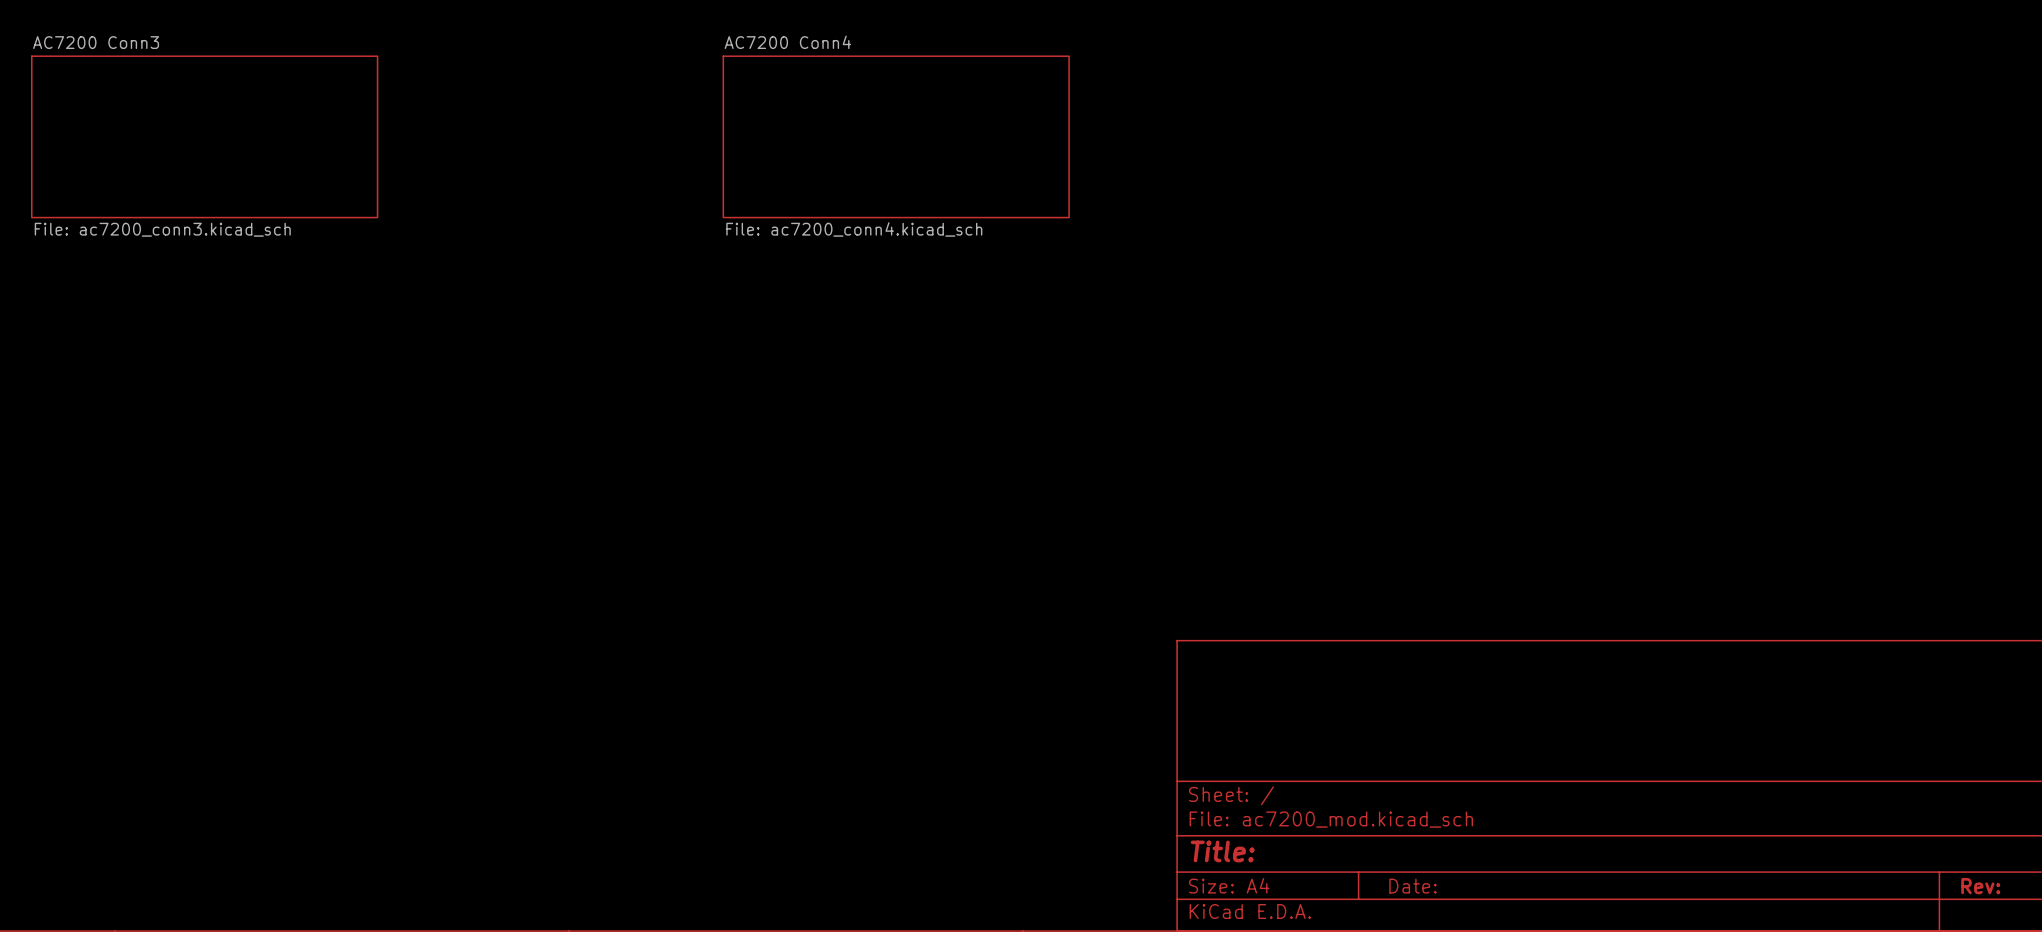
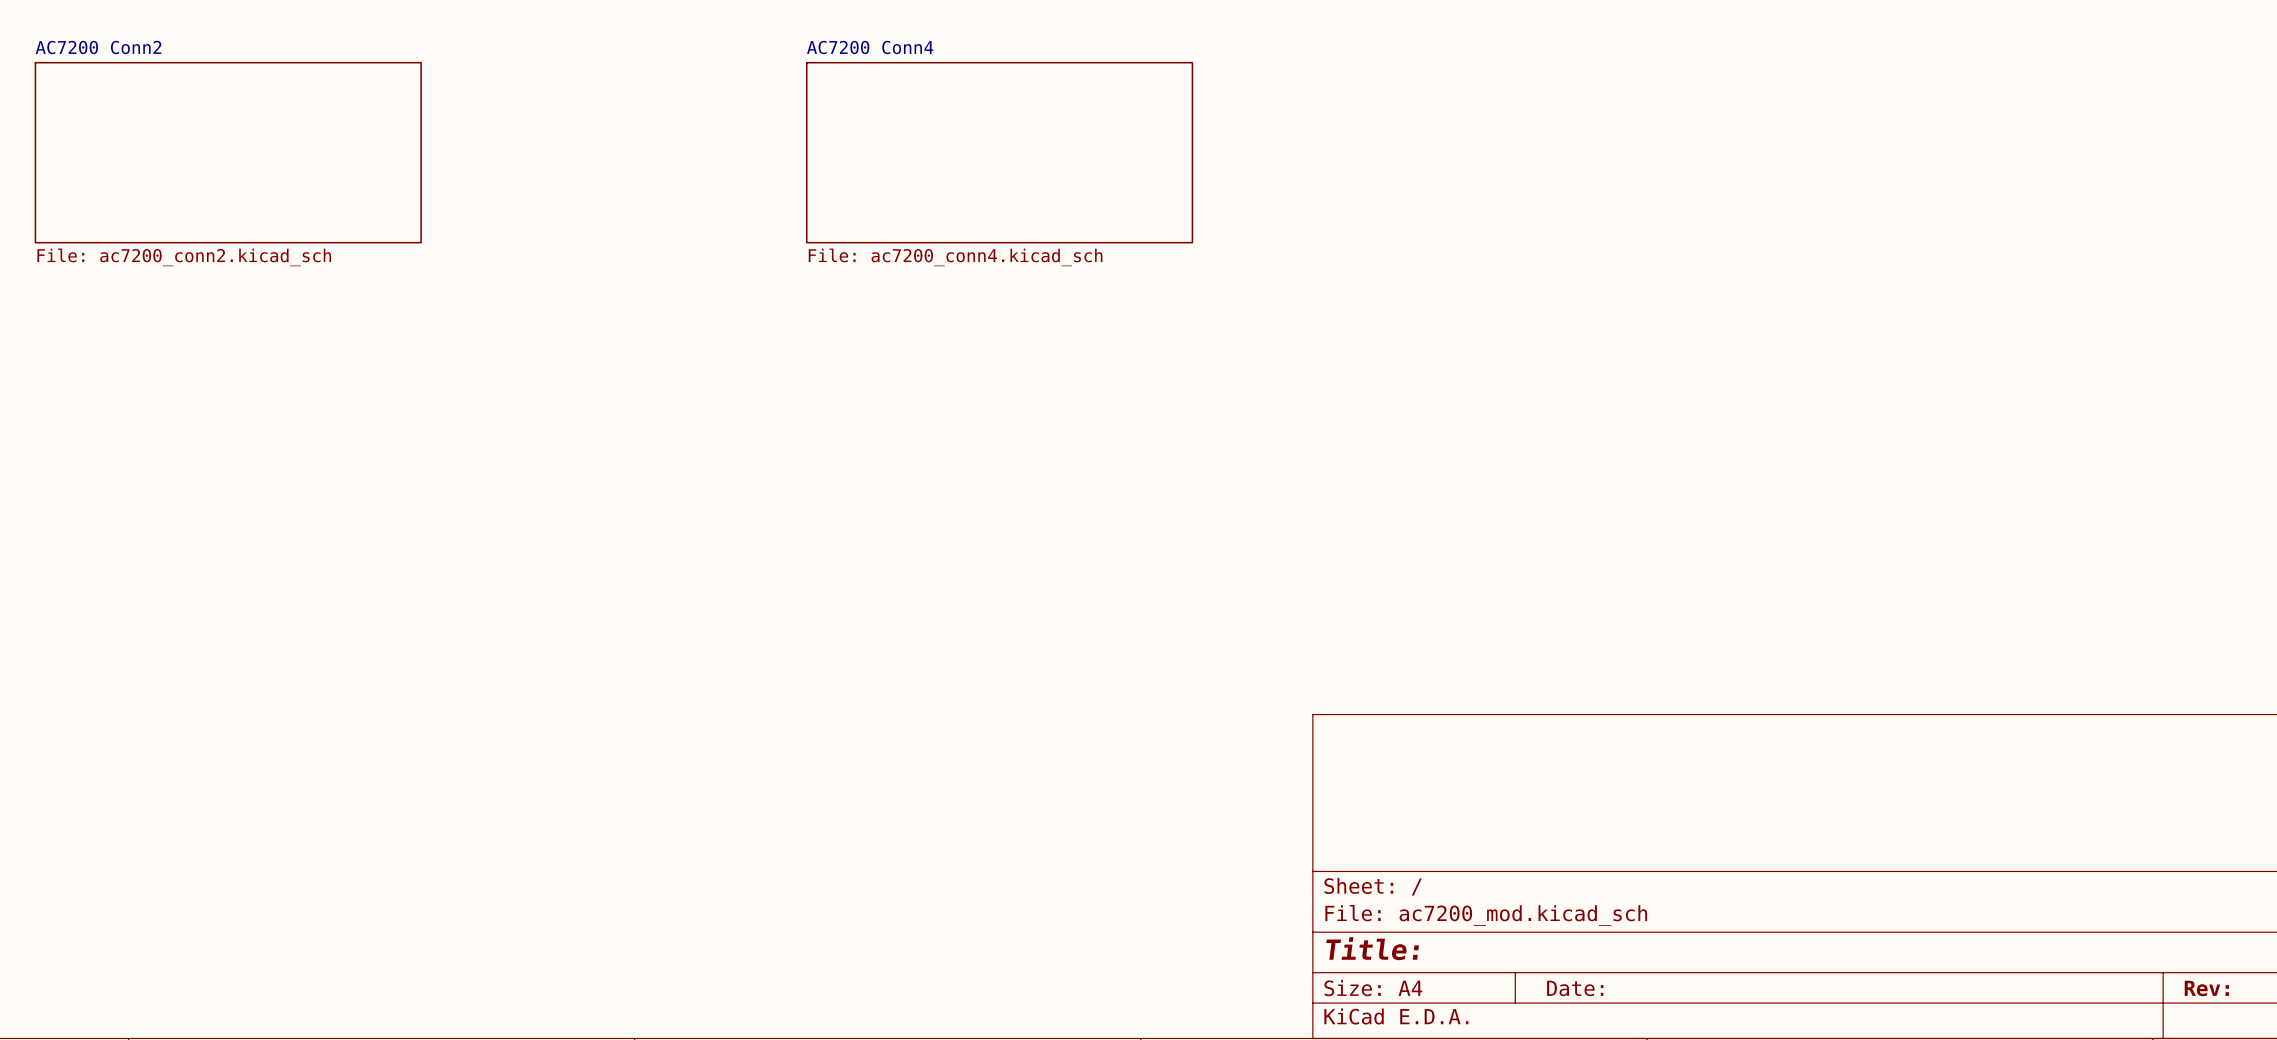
sheet AC7200 Conn3 name: AC7200 Conn3 (96, 42) -> AC7200 Conn2 (98, 47)
sheet AC7200 Conn3 value: File: ac7200_conn3.kicad_sch (162, 229) -> File: ac7200_conn2.kicad_sch (184, 257)

